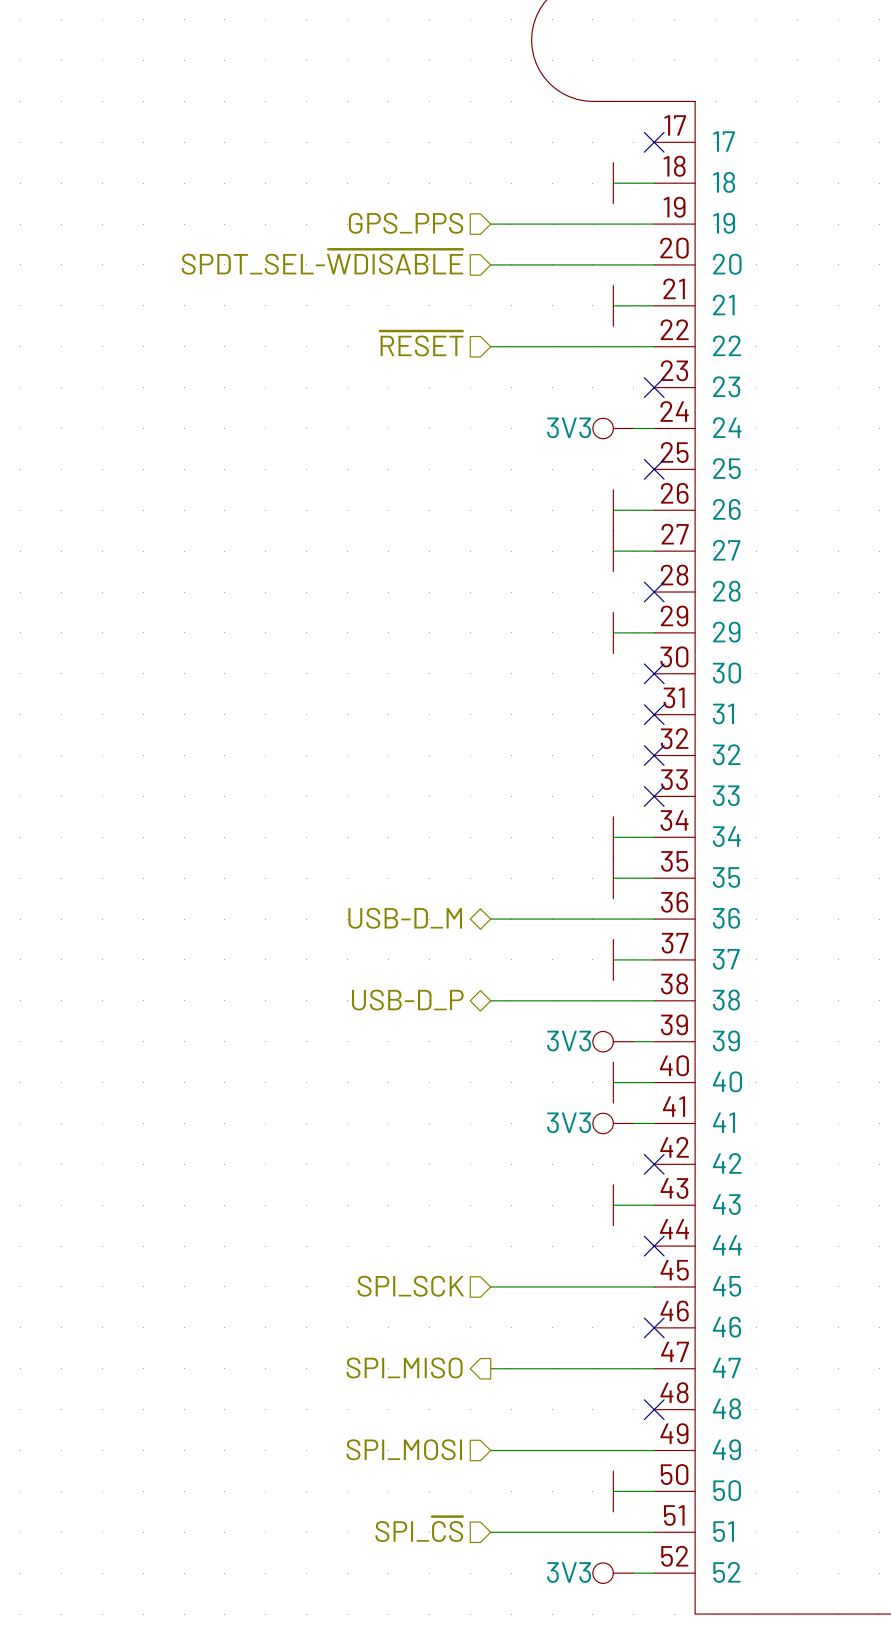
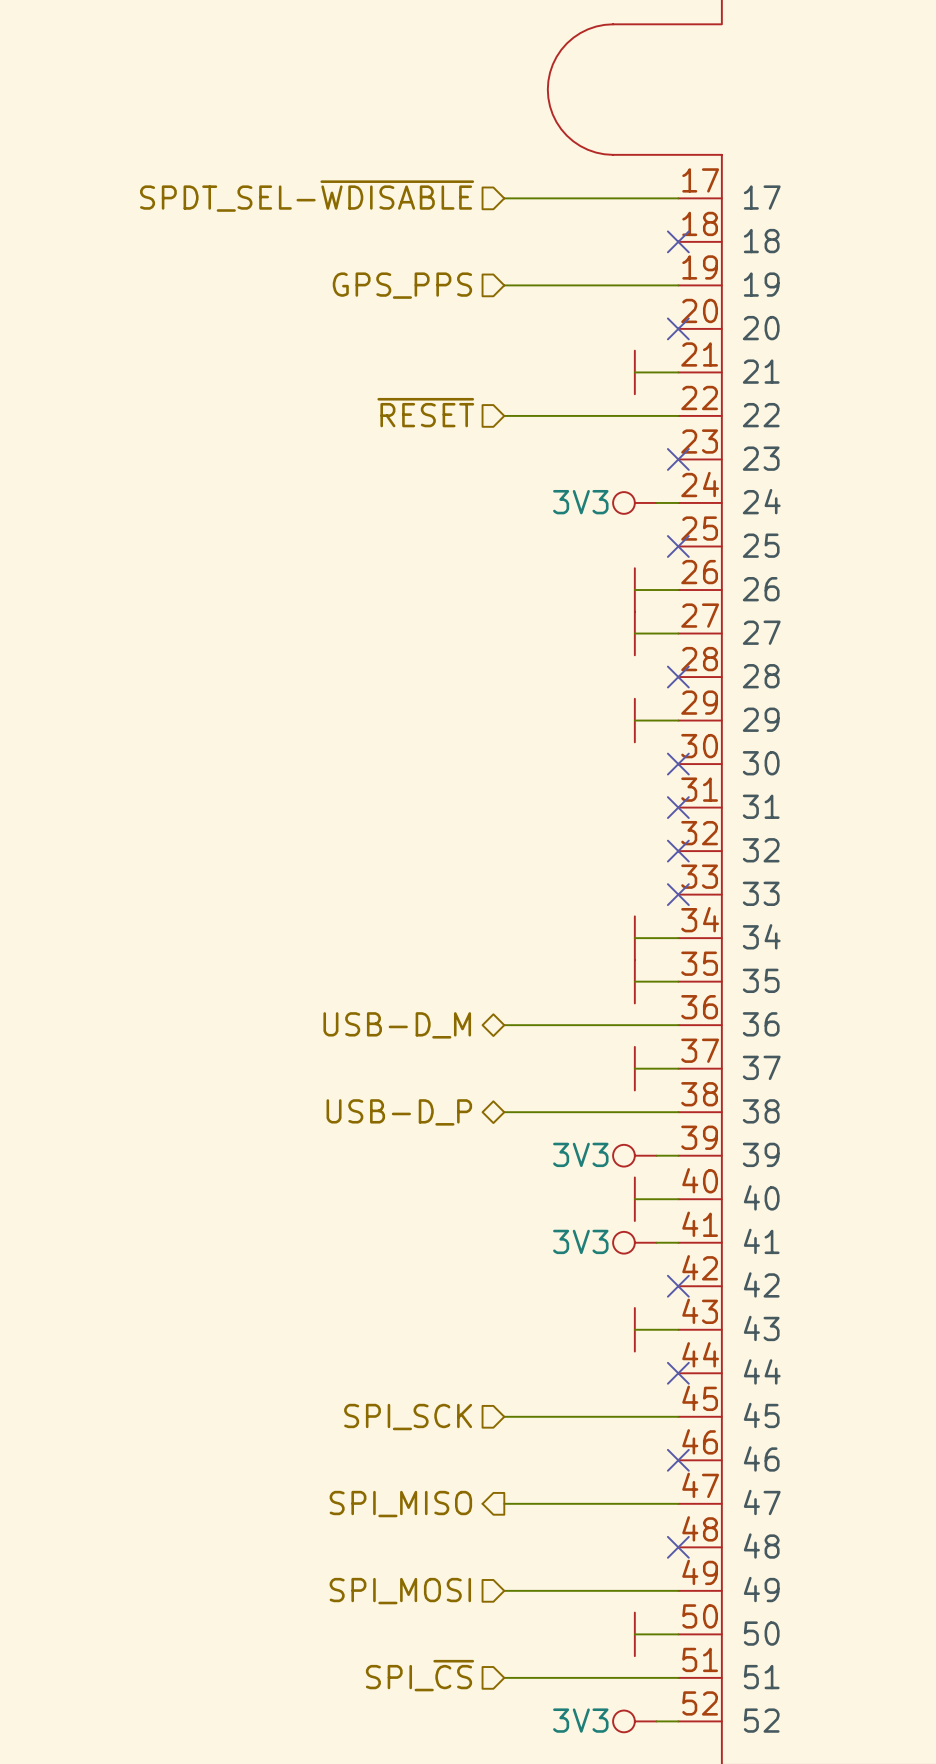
no-connect mark position: (654, 142) -> (678, 241)
wire: (613, 183) (654, 183) -> none
power symbol: (613, 183) -> none
hierarchical label position: SPDT_SEL-~{WDISABLE} (322, 261) -> SPDT_SEL-~{WDISABLE} (307, 196)
wire: (490, 264) (654, 264) -> (504, 198) (678, 198)
no-connect mark: none -> (678, 328)

